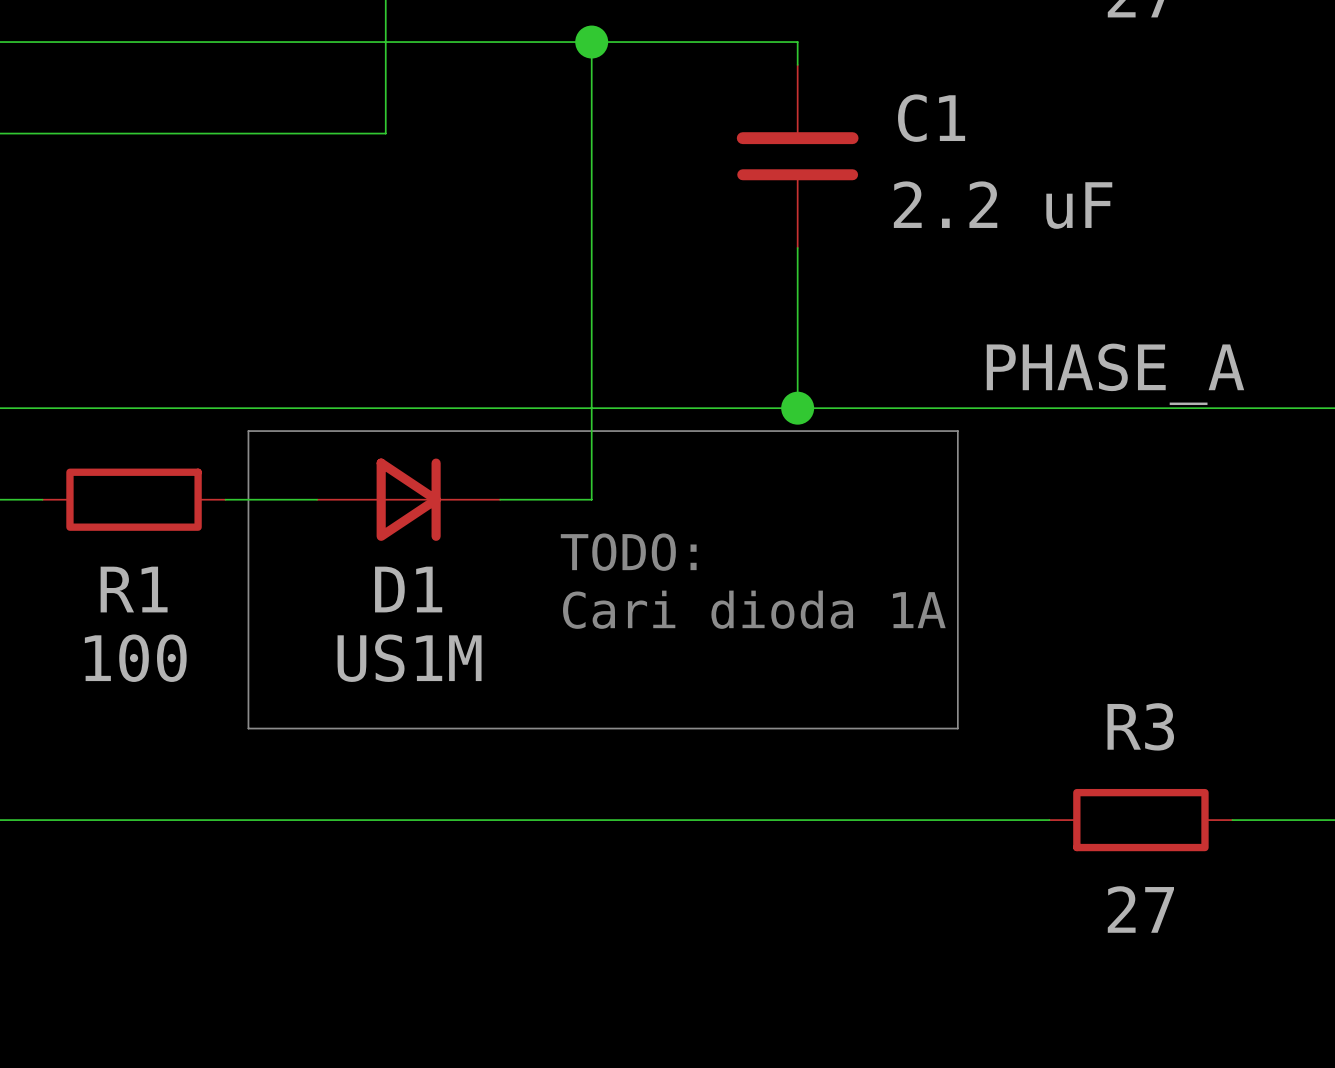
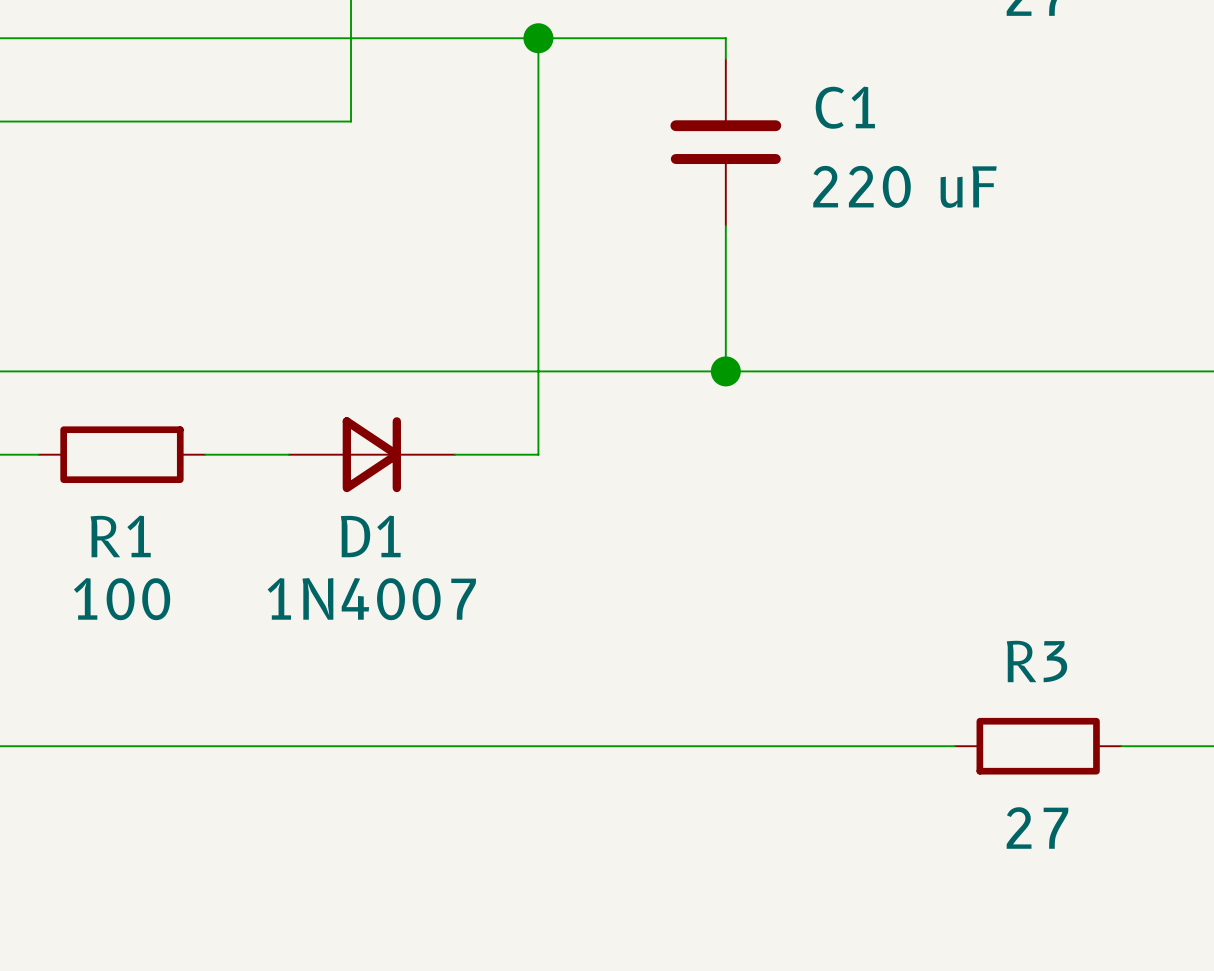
C1 value: 2.2 uF (1003, 205) -> 220 uF (904, 186)
label: PHASE_A (1115, 374) -> none
line: (248, 431) (957, 431) (957, 728) (248, 728) (248, 431) -> none
text: TODO: (628, 552) -> none
text: Cari dioda 1A (754, 609) -> none
D1 value: US1M (409, 658) -> 1N4007 (371, 599)

